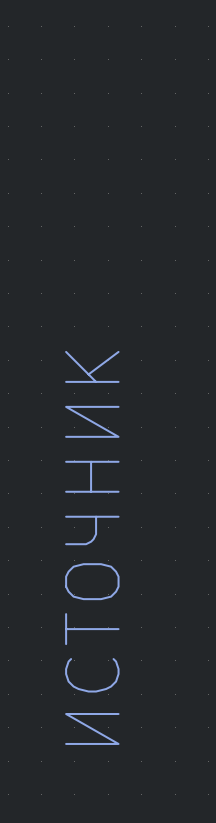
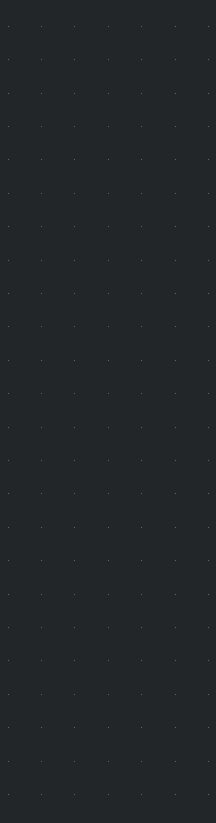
text: ИСТОЧНИК (92, 547) -> none

